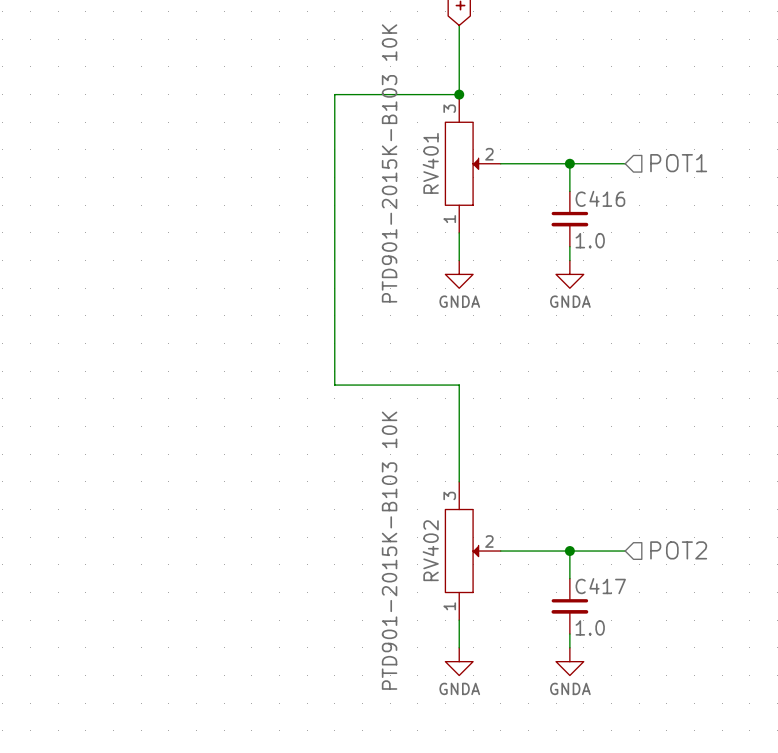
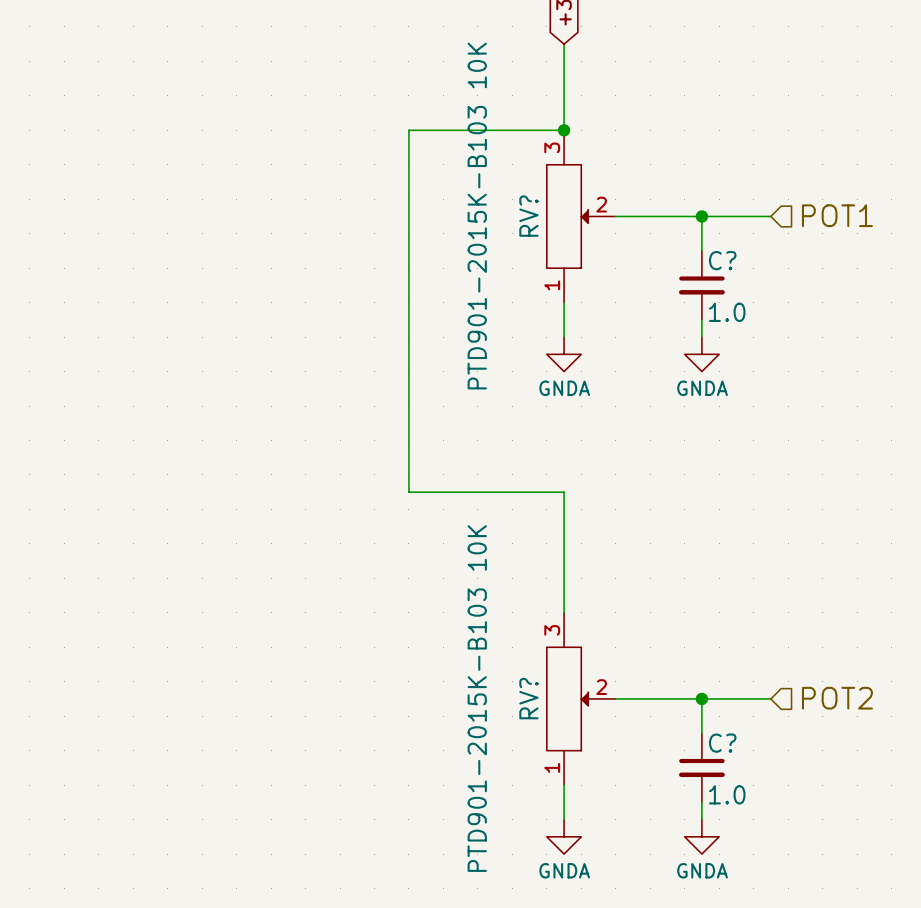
RV401 name: RV401 (430, 163) -> RV? (528, 216)
C416 name: C416 (600, 198) -> C? (722, 260)
RV402 name: RV402 (430, 550) -> RV? (528, 698)
C417 name: C417 (600, 586) -> C? (722, 743)

